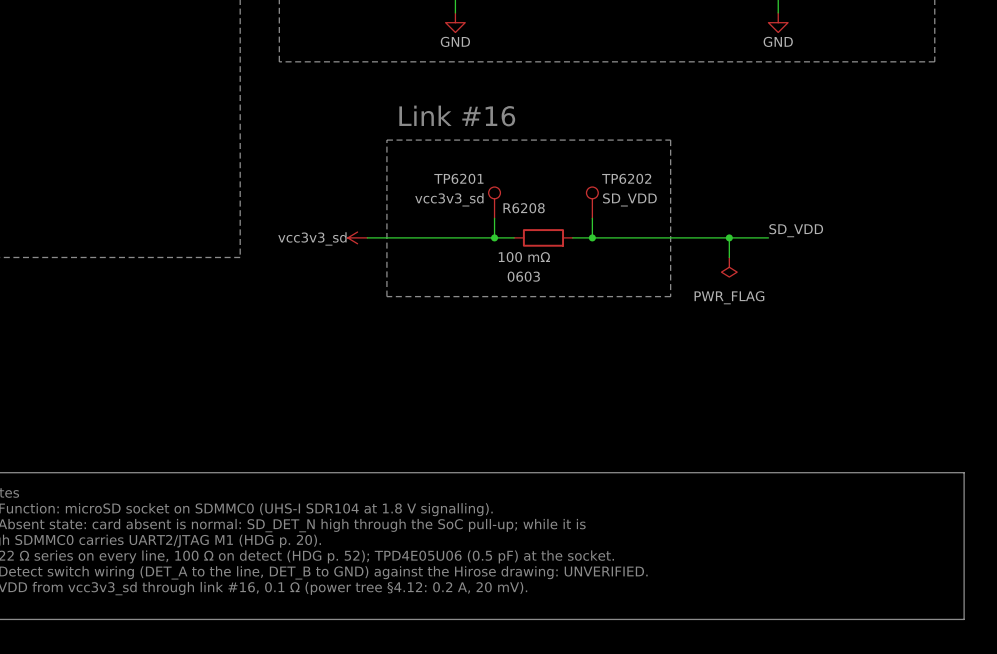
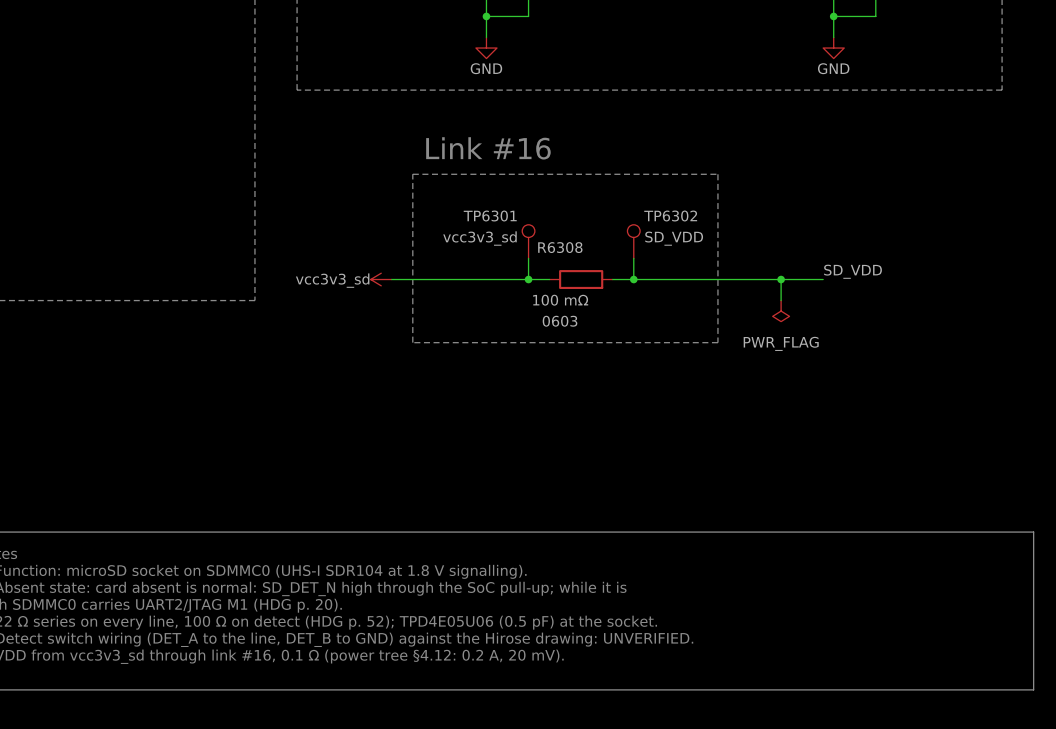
TP6201 name: TP6201 (458, 178) -> TP6301 (490, 216)
TP6202 name: TP6202 (626, 178) -> TP6302 (670, 216)
R6208 name: R6208 (524, 208) -> R6308 (560, 247)

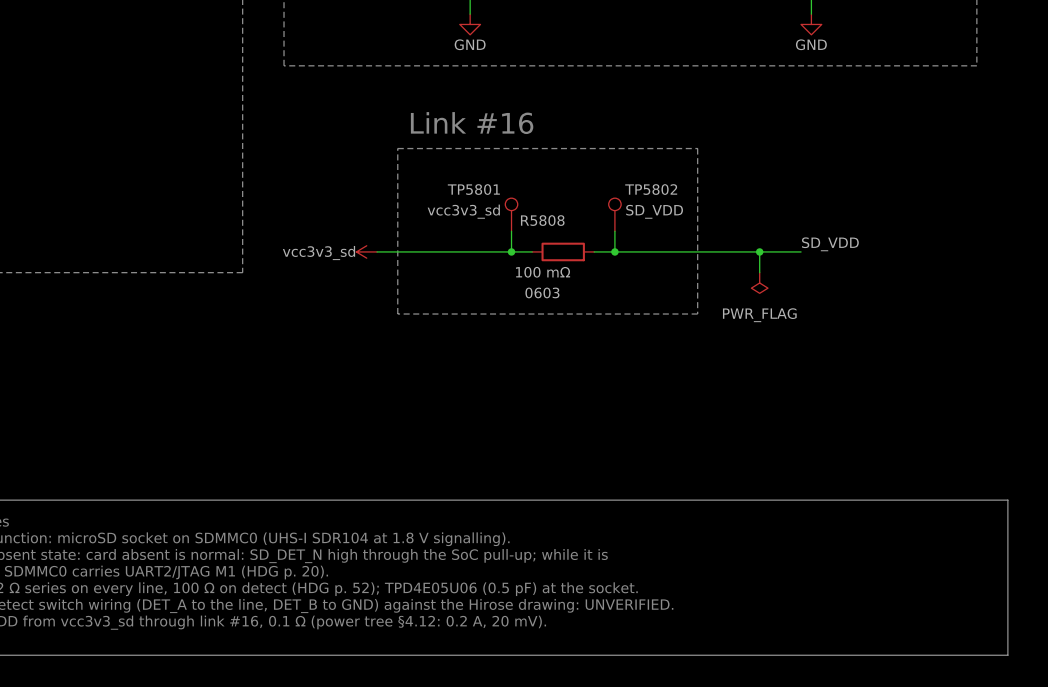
TP6301 name: TP6301 (490, 216) -> TP5801 (473, 189)
TP6302 name: TP6302 (670, 216) -> TP5802 (651, 189)
R6308 name: R6308 (560, 247) -> R5808 (542, 220)

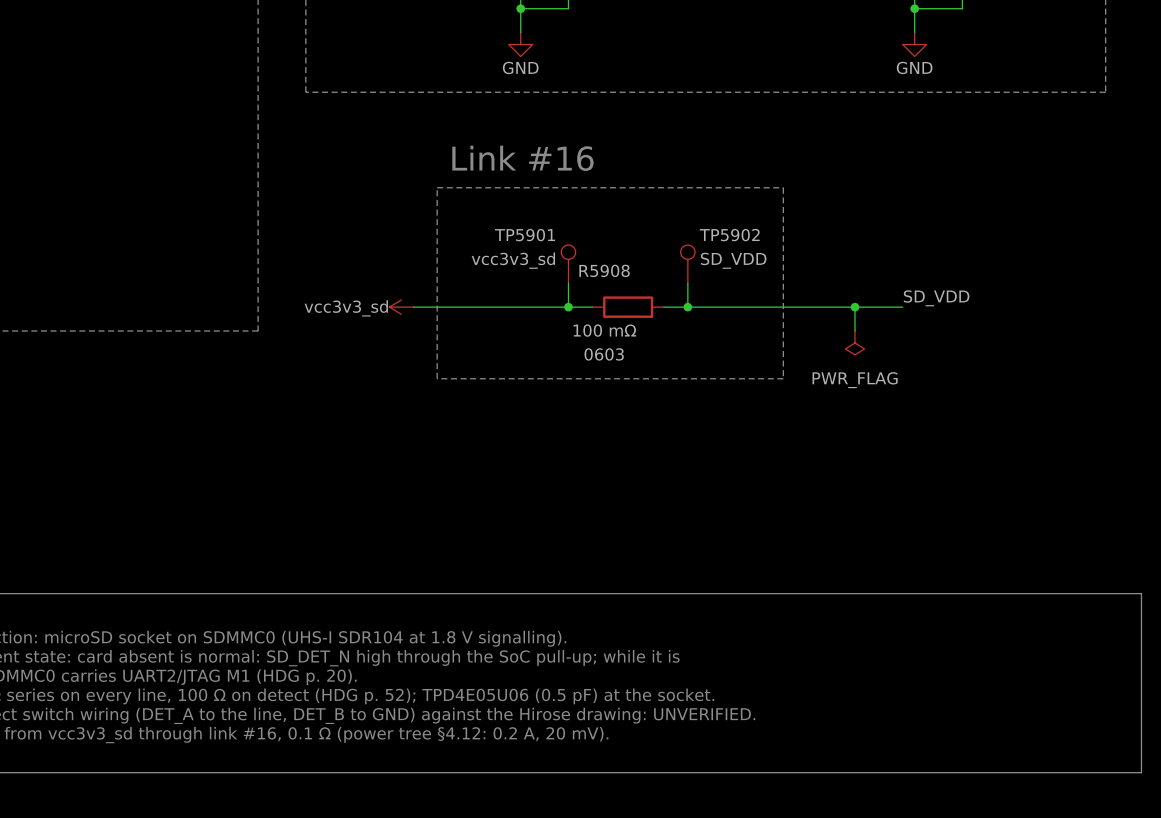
TP5801 name: TP5801 (473, 189) -> TP5901 (524, 235)
TP5802 name: TP5802 (651, 189) -> TP5902 (729, 235)
R5808 name: R5808 (542, 220) -> R5908 (604, 270)

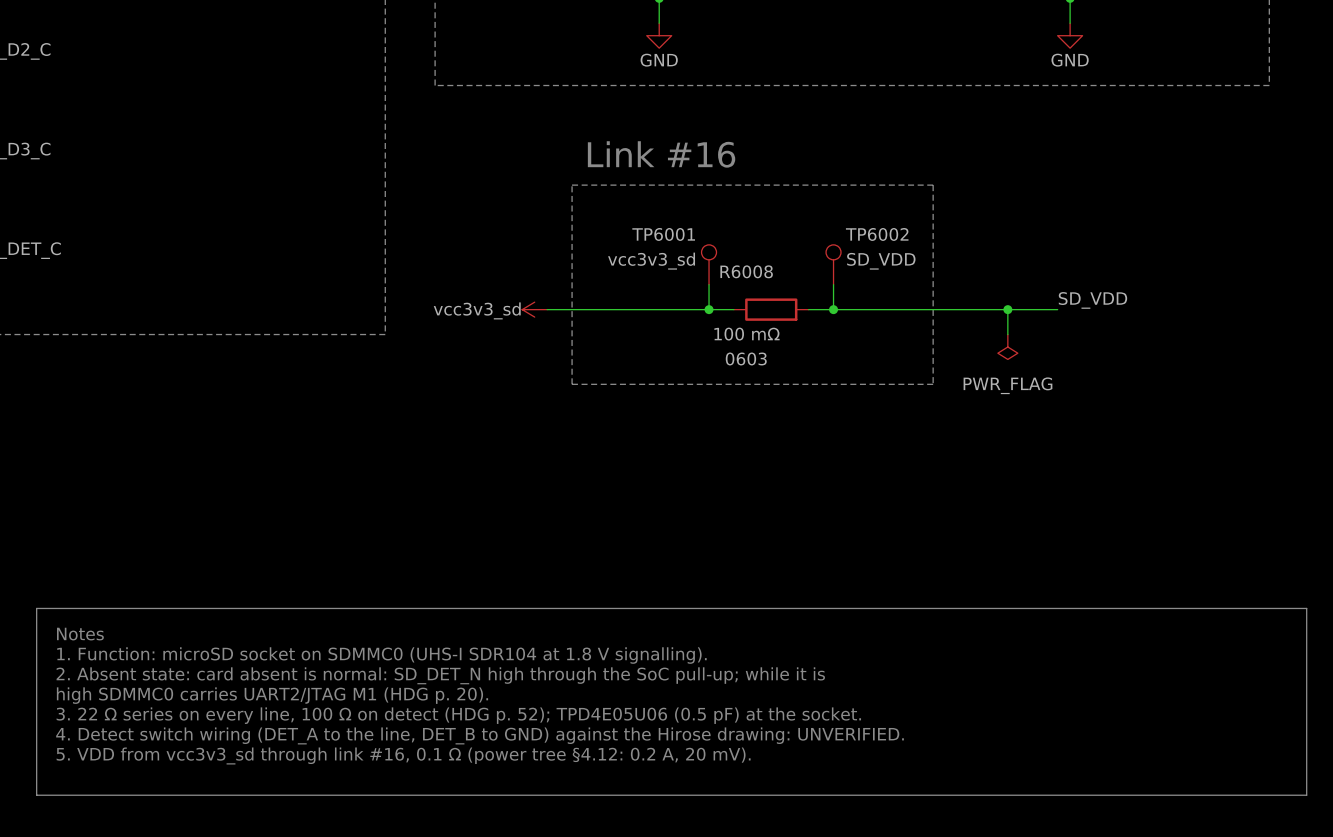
TP5901 name: TP5901 (524, 235) -> TP6001 (663, 234)
TP5902 name: TP5902 (729, 235) -> TP6002 (877, 234)
R5908 name: R5908 (604, 270) -> R6008 (746, 271)

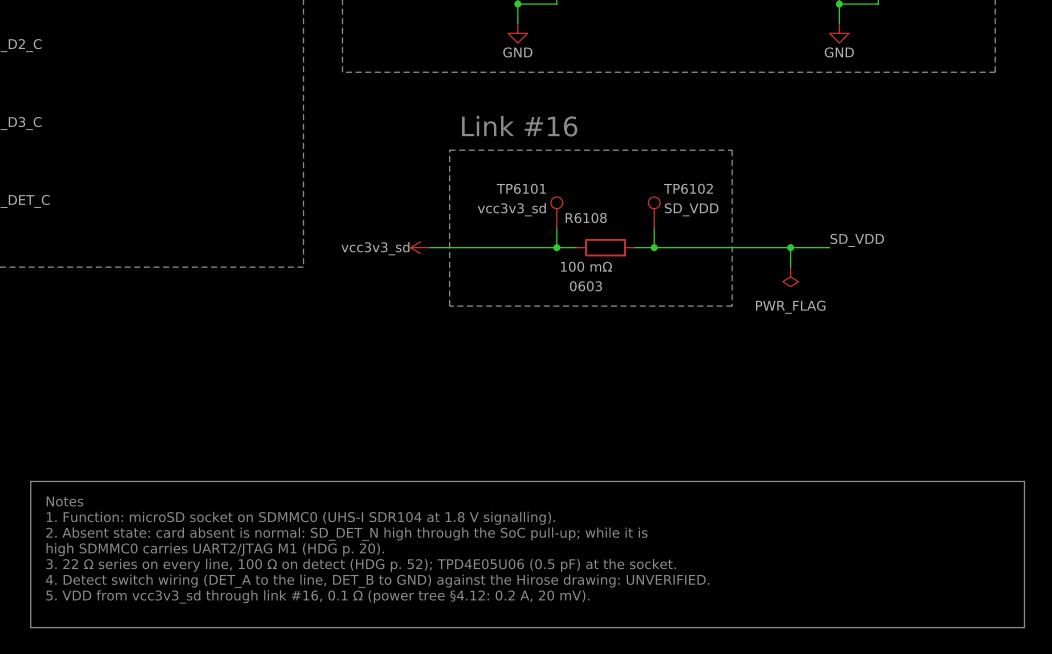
TP6001 name: TP6001 (663, 234) -> TP6101 (521, 188)
TP6002 name: TP6002 (877, 234) -> TP6102 (688, 188)
R6008 name: R6008 (746, 271) -> R6108 (586, 218)

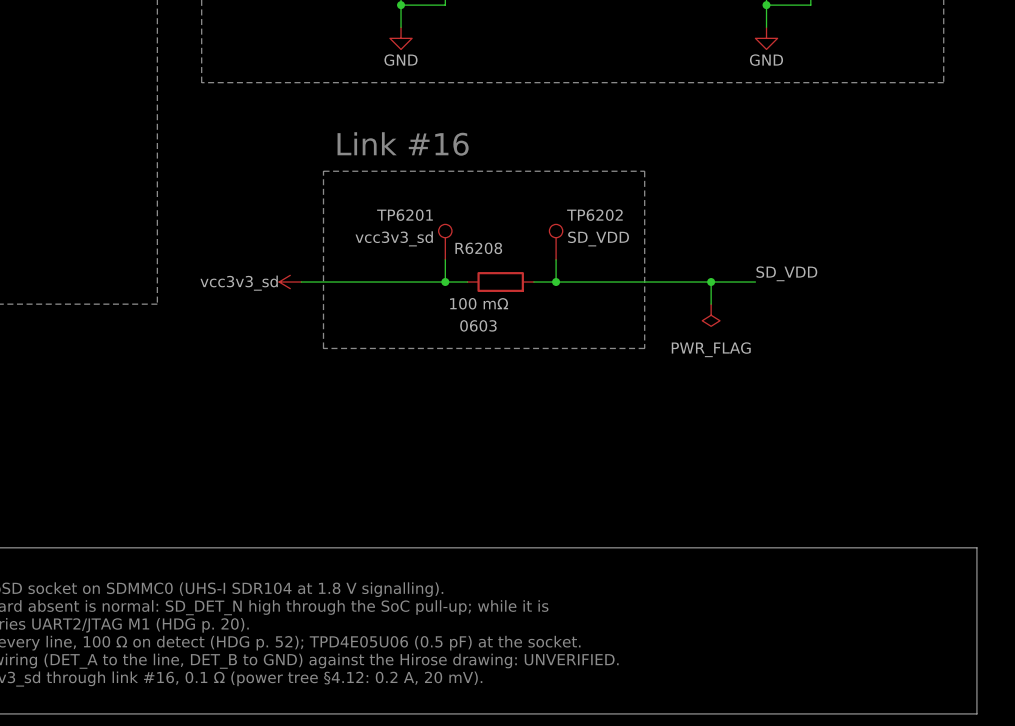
TP6101 name: TP6101 (521, 188) -> TP6201 (404, 215)
TP6102 name: TP6102 (688, 188) -> TP6202 (594, 215)
R6108 name: R6108 (586, 218) -> R6208 (478, 248)

